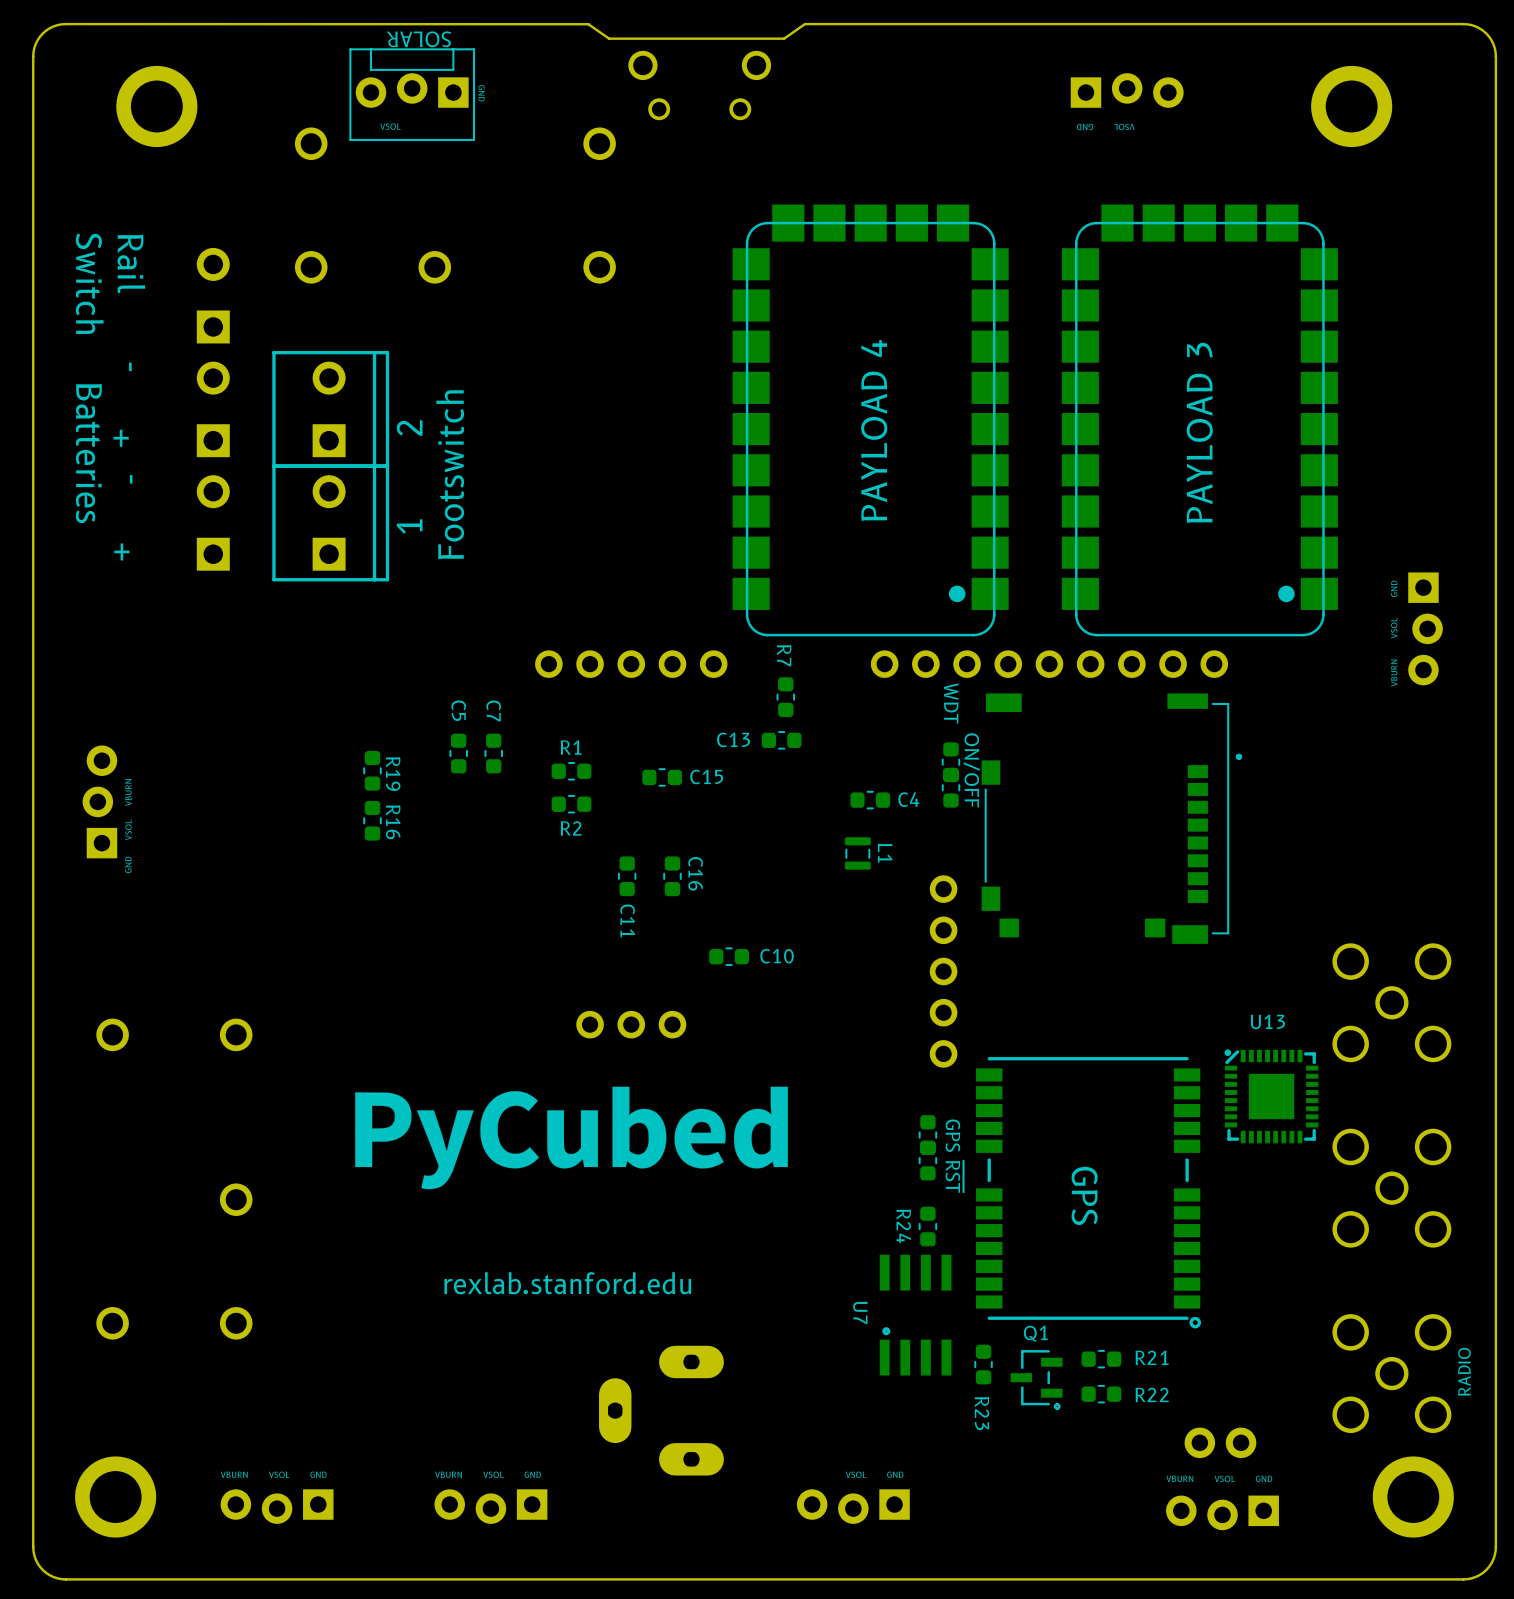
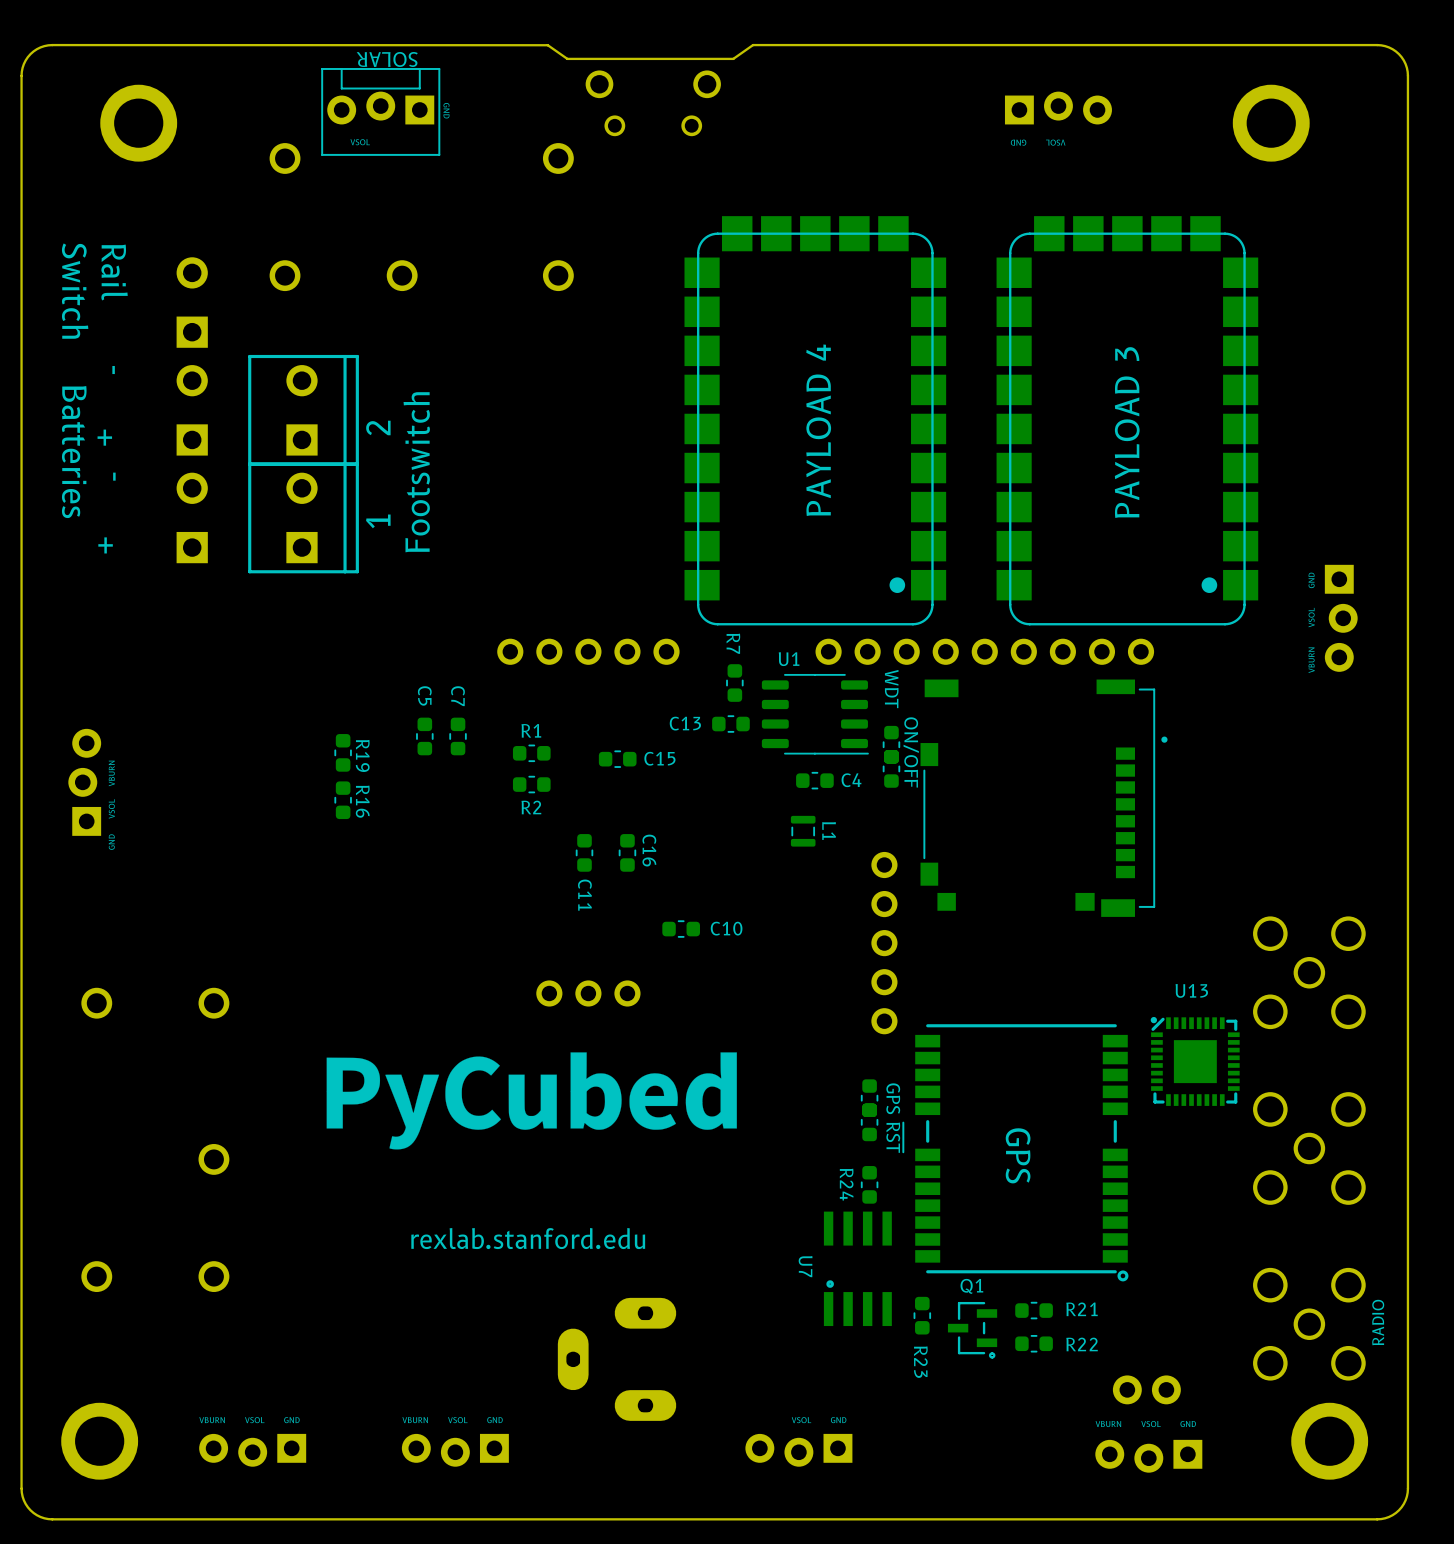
U1: none -> (815, 714)

